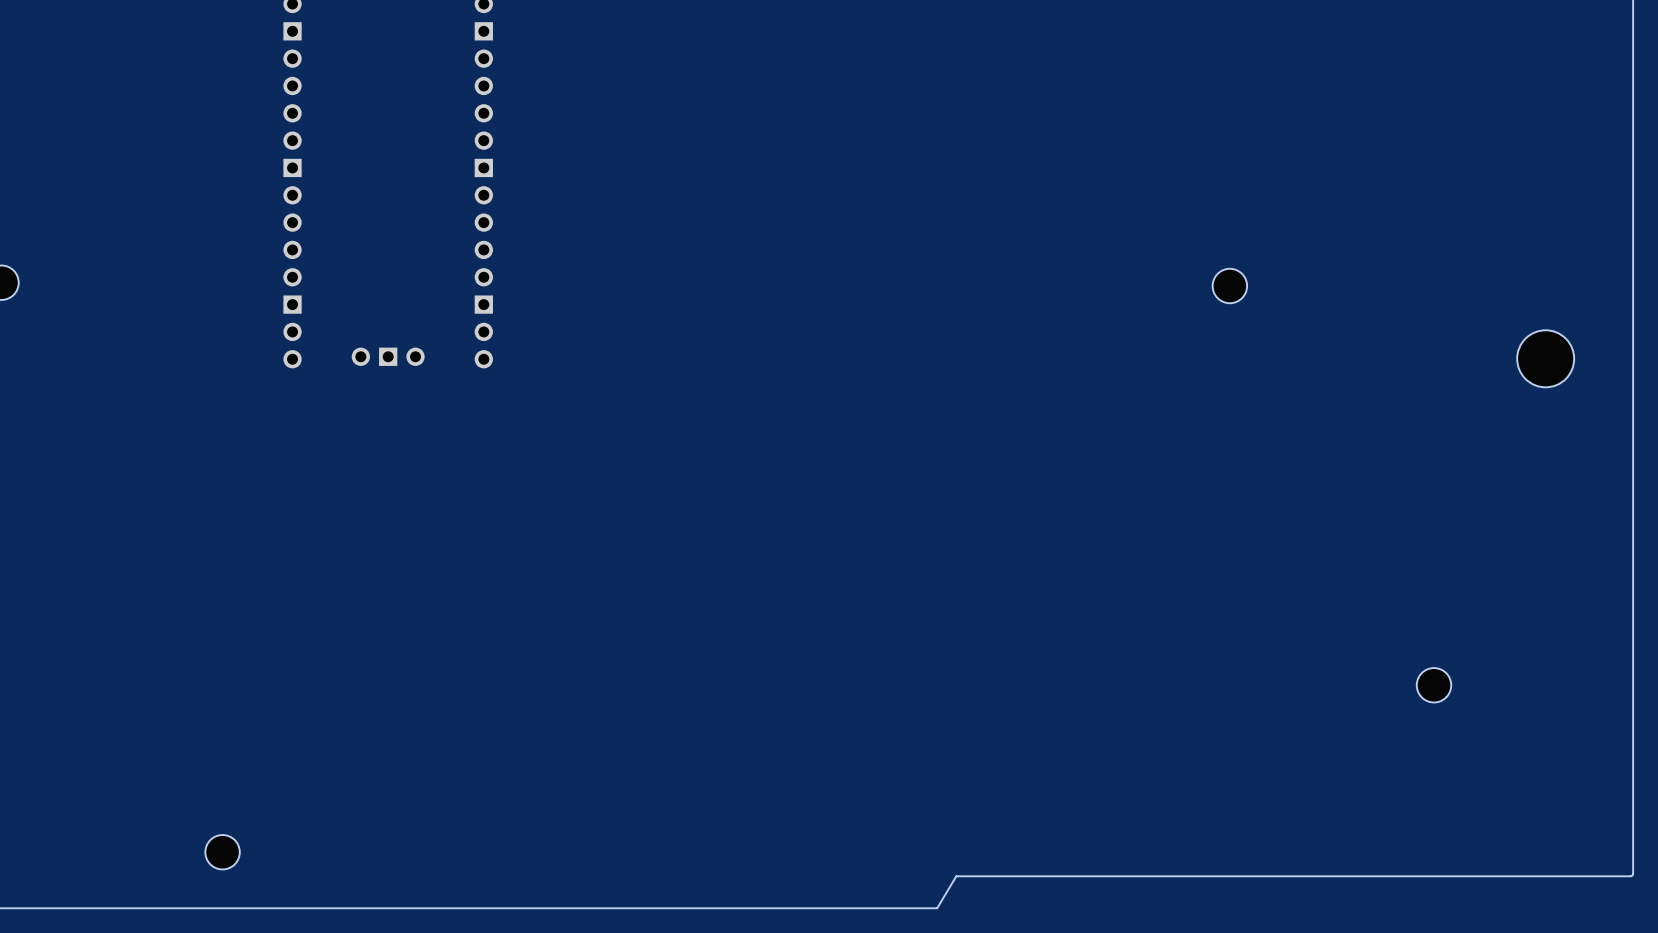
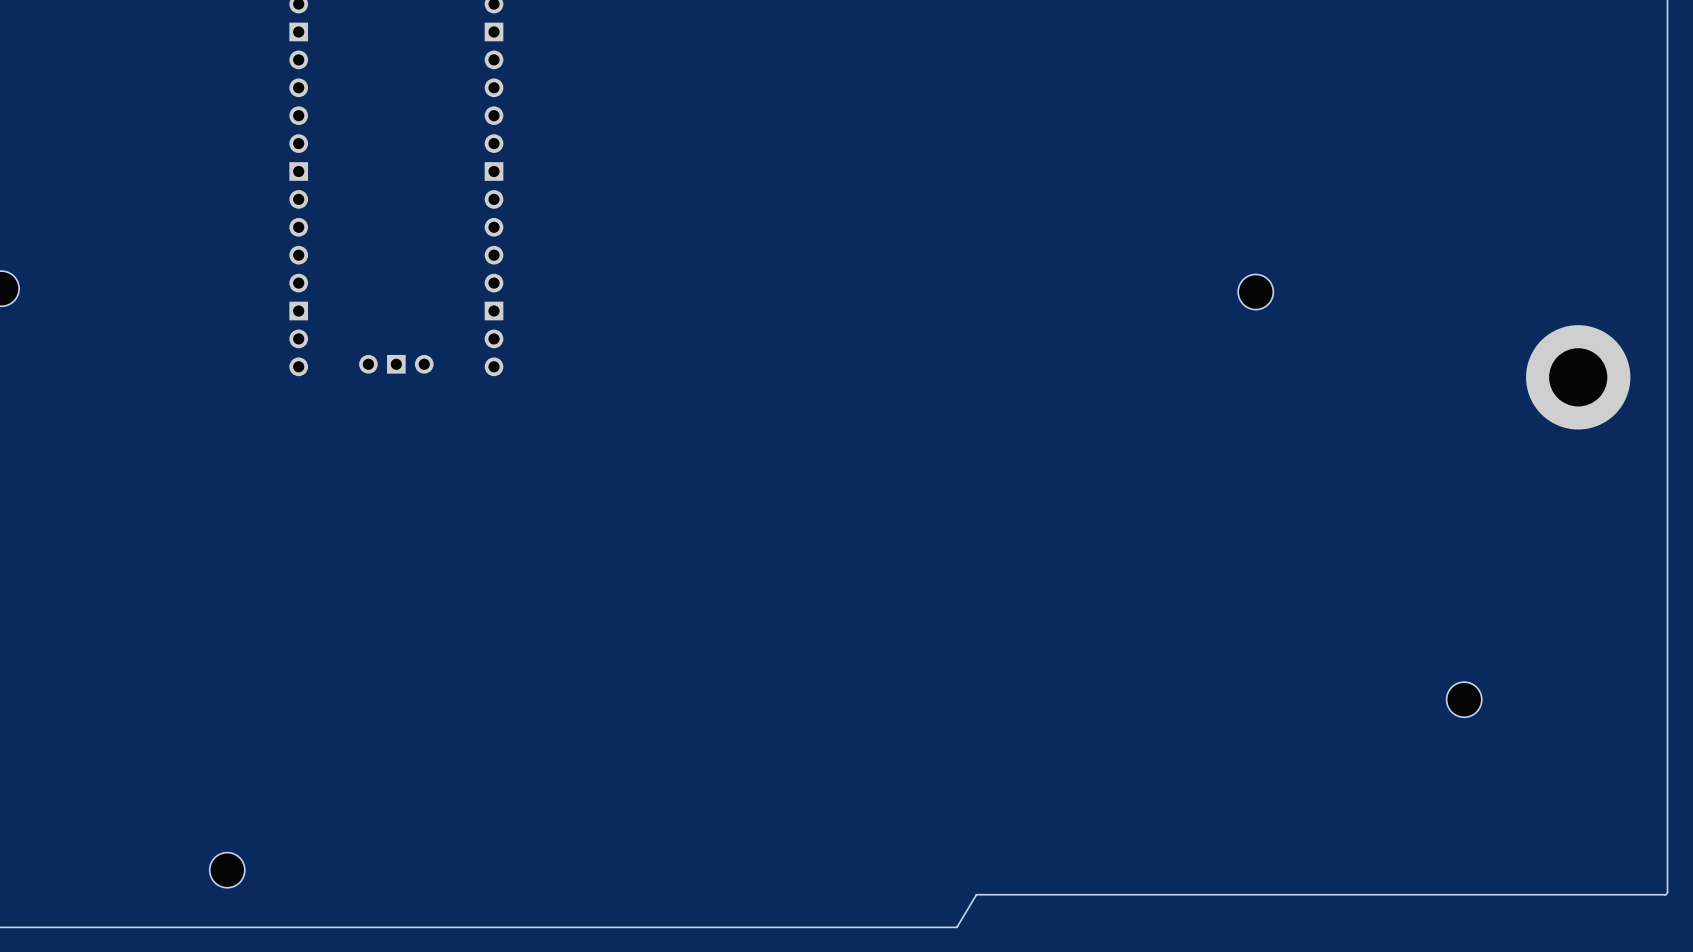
part footprint: [1517, 330, 1575, 388] -> [1526, 325, 1631, 430]

